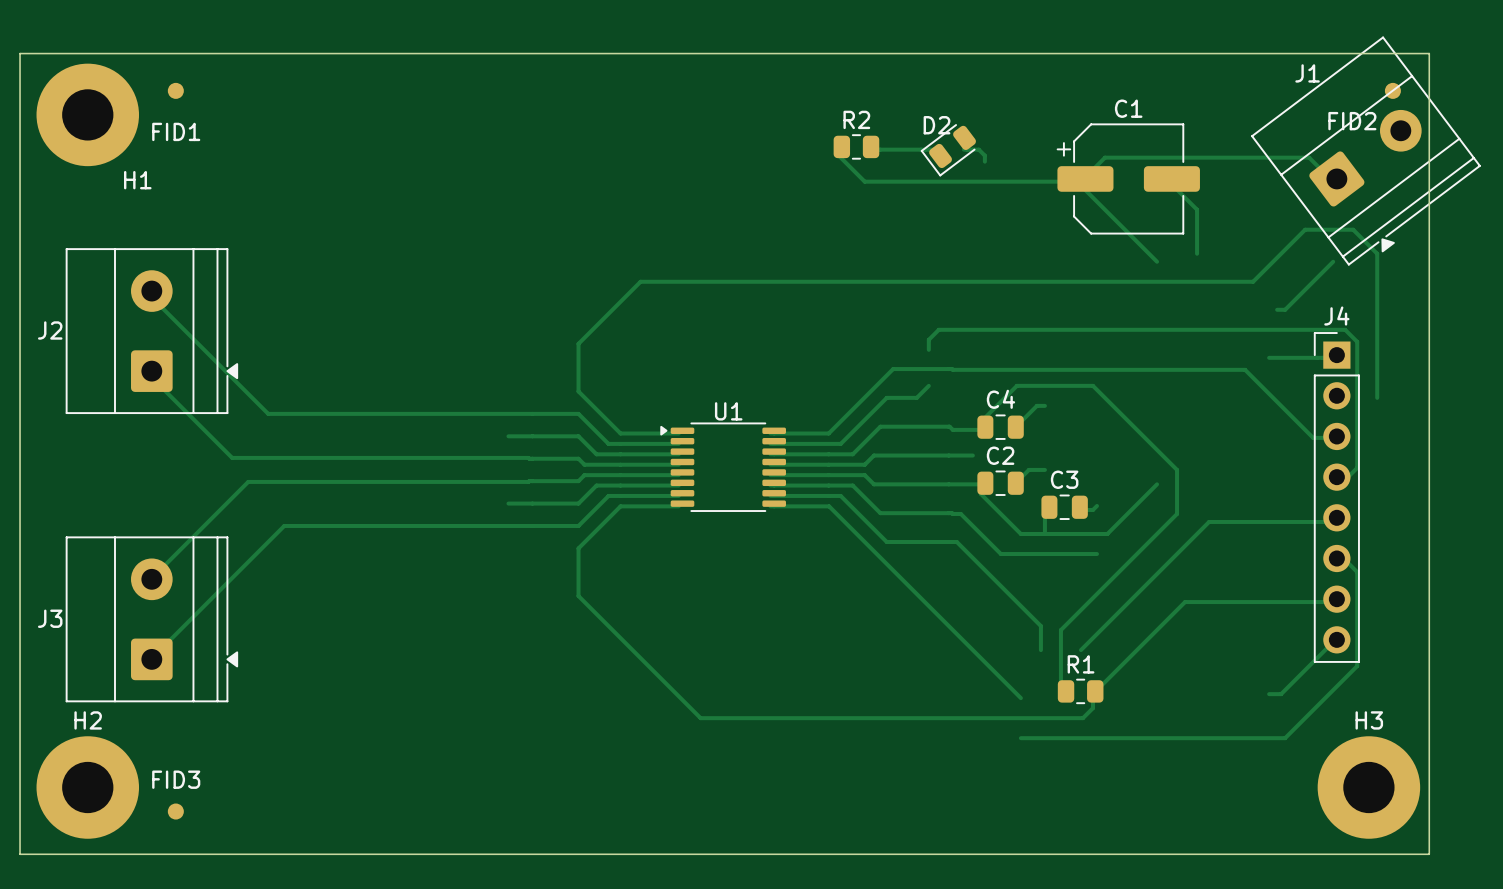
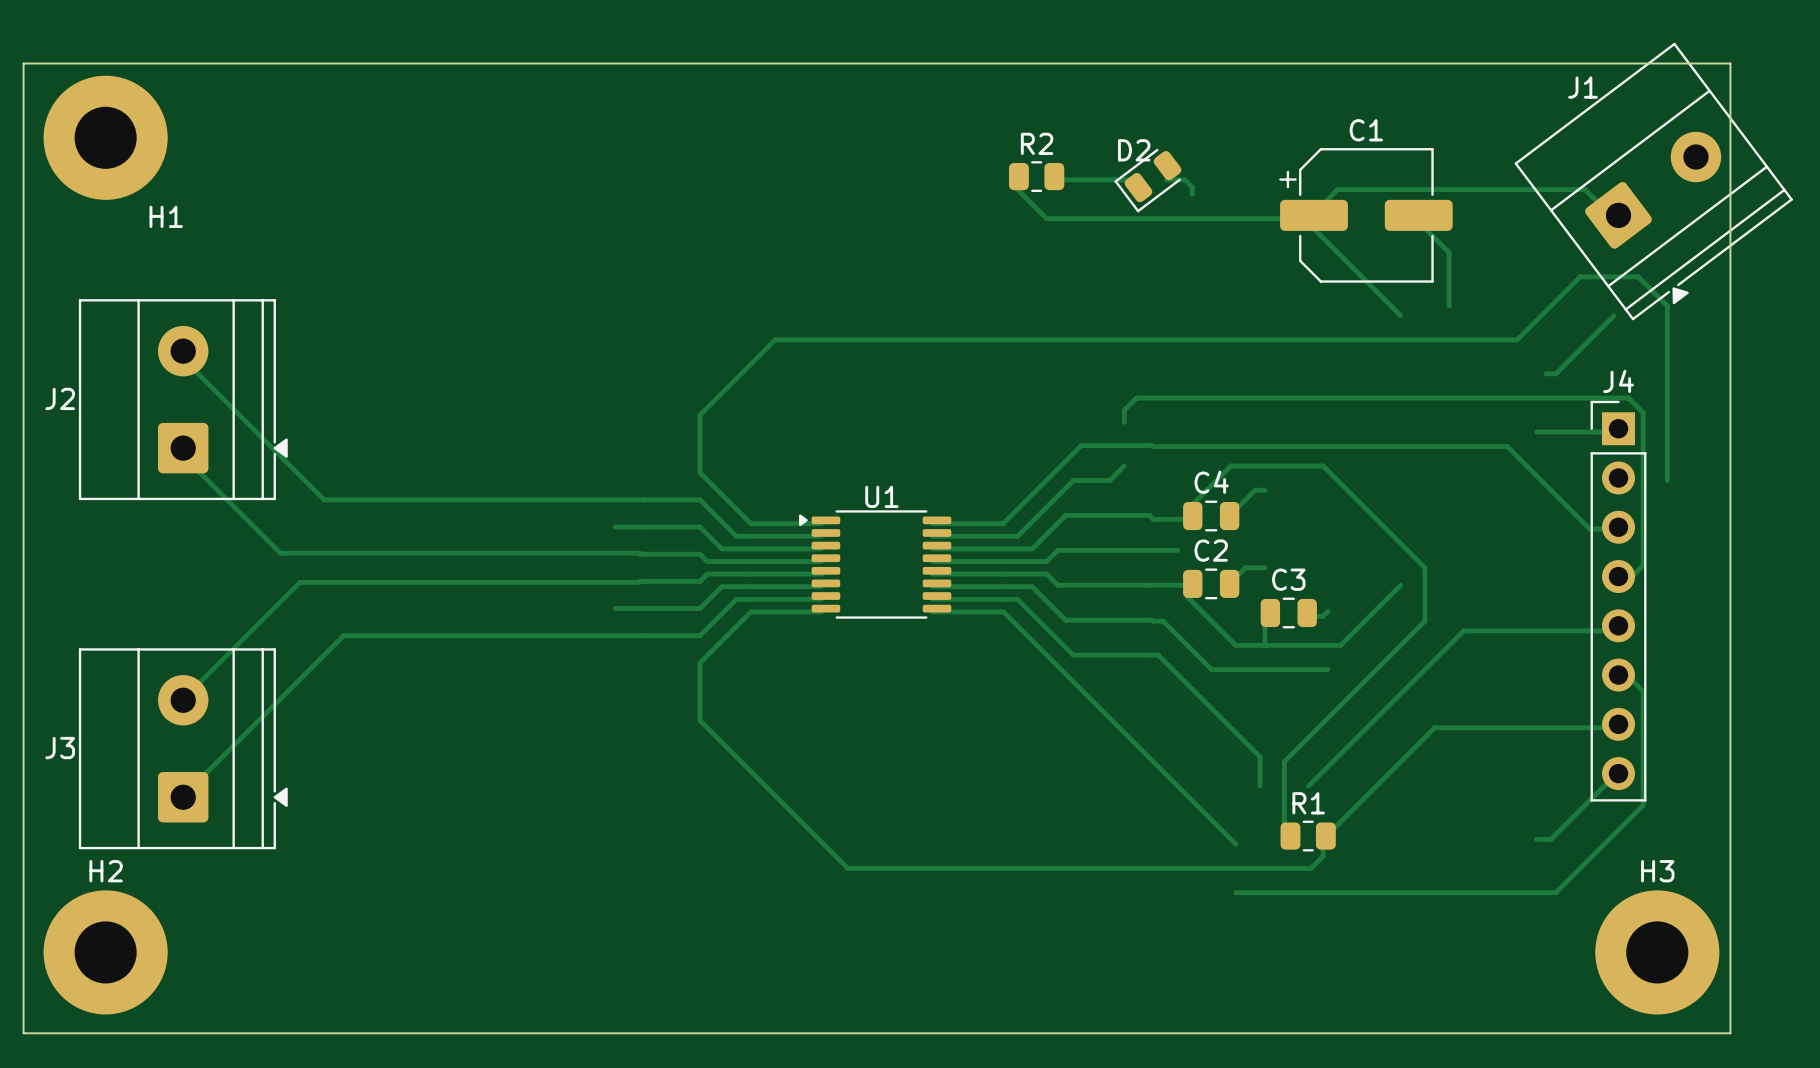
FID1: (175, 90) -> none
FID2: (1392, 90) -> none
FID3: (175, 811) -> none

